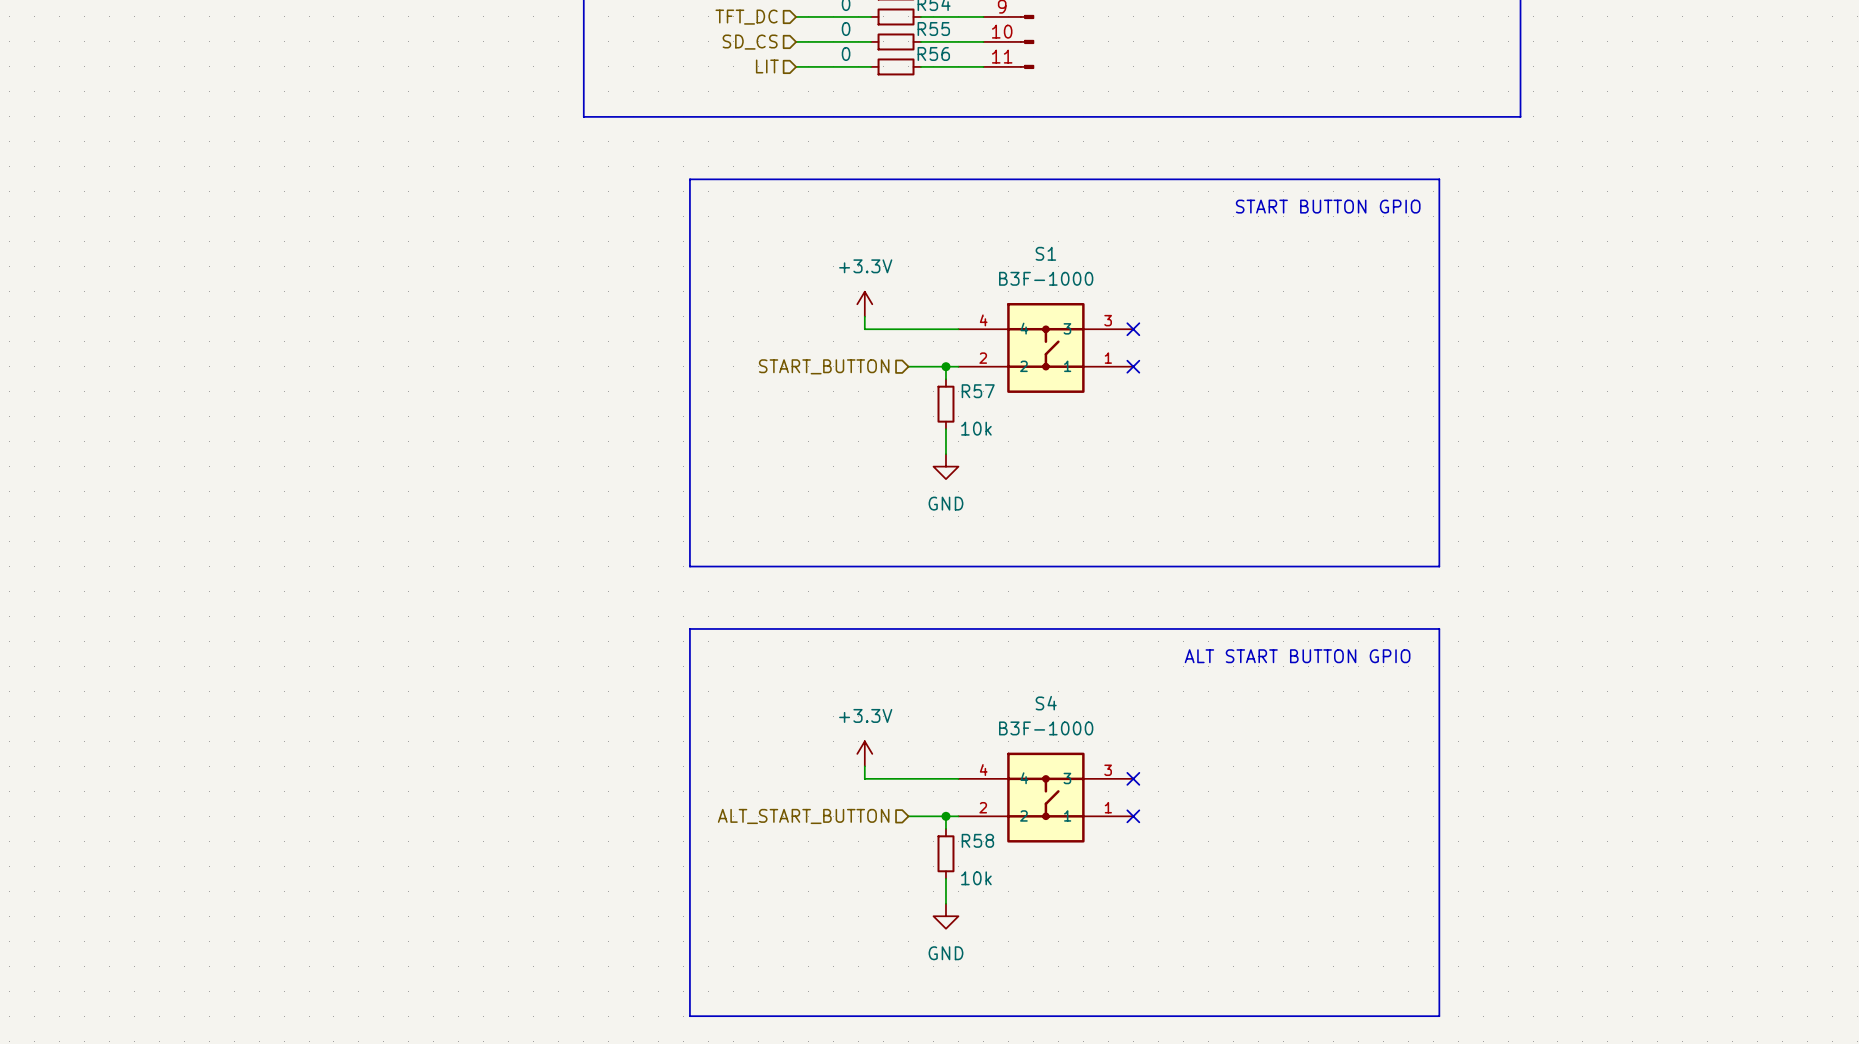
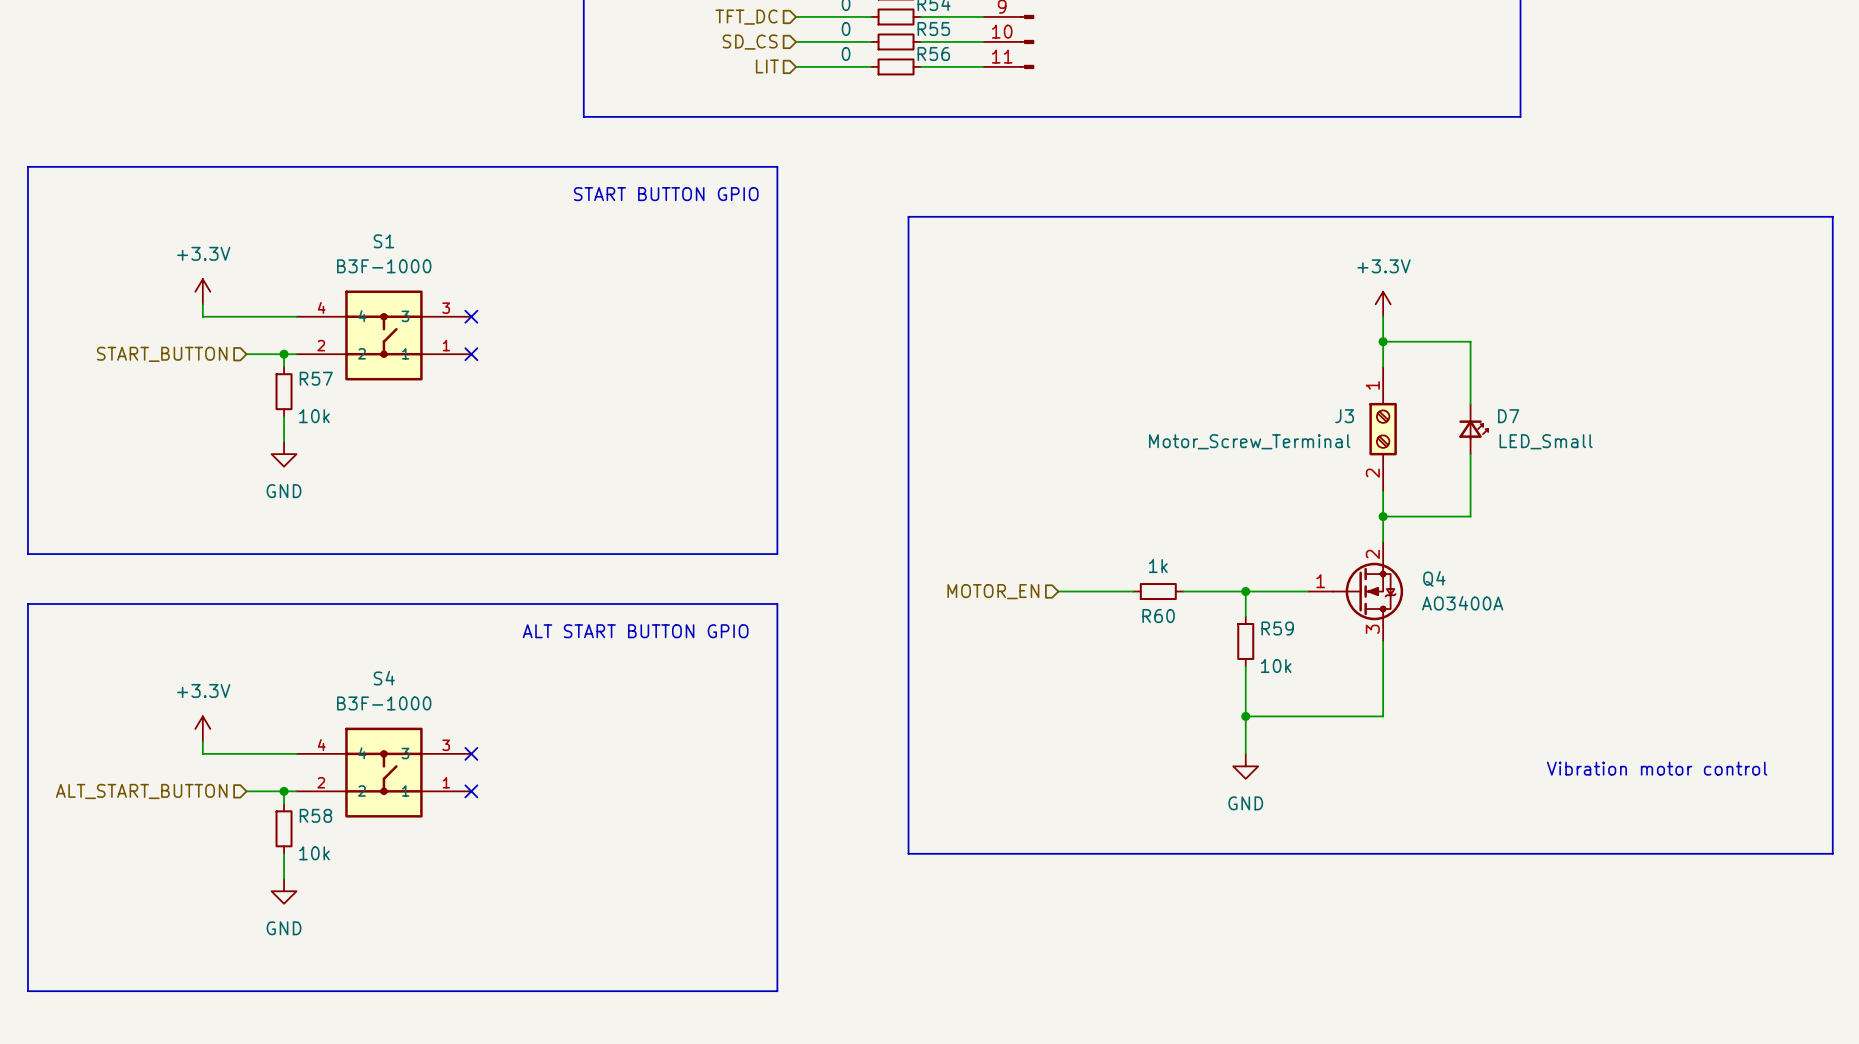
line: none -> (27, 166) (777, 166) (777, 554) (27, 554) (27, 166)
line: (689, 179) (689, 566) (1439, 566) (1439, 179) (689, 179) -> none
text: none -> START BUTTON GPIO (666, 194)
text: START BUTTON GPIO (1328, 206) -> none
line: none -> (908, 216) (1832, 216) (1832, 853) (908, 853) (908, 216)
power symbol: none -> +3.3V (202, 291)
wire: none -> (202, 304) (202, 316) (296, 316)
power symbol: +3.3V (864, 304) -> none
power symbol: none -> +3.3V (1383, 304)
no-connect mark: none -> (471, 316)
wire: (864, 316) (864, 329) (958, 329) -> none
wire: none -> (1383, 316) (1383, 366)
no-connect mark: (1133, 329) -> none
wire: none -> (1383, 341) (1470, 341) (1470, 404)
junction: none -> (1383, 341)
S1 position: (1045, 347) -> (383, 335)
hierarchical label: none -> START_BUTTON (162, 354)
wire: none -> (246, 354) (296, 354)
wire: none -> (284, 354) (284, 366)
junction: none -> (284, 354)
no-connect mark: none -> (471, 354)
hierarchical label: START_BUTTON (824, 366) -> none
wire: (908, 366) (958, 366) -> none
wire: (945, 366) (945, 379) -> none
junction: (945, 366) -> none
no-connect mark: (1133, 366) -> none
R57 position: (945, 404) -> (284, 391)
wire: none -> (284, 416) (284, 441)
wire: (945, 429) (945, 454) -> none
J3: none -> Motor_Screw_Terminal (1383, 429)
D7: none -> LED_Small (1473, 429)
power symbol: none -> GND (284, 454)
wire: none -> (1470, 454) (1470, 516) (1383, 516)
power symbol: GND (945, 466) -> none
wire: none -> (1383, 491) (1383, 541)
junction: none -> (1383, 516)
hierarchical label: none -> MOTOR_EN (993, 591)
wire: none -> (1058, 591) (1133, 591)
R60: none -> 1k (1158, 591)
wire: none -> (1183, 591) (1308, 591)
wire: none -> (1245, 591) (1245, 616)
junction: none -> (1245, 591)
Q4: none -> AO3400A (1355, 591)
line: none -> (27, 604) (777, 604) (777, 991) (27, 991) (27, 604)
line: (689, 628) (1439, 628) (1439, 1016) (689, 1016) (689, 628) -> none
text: none -> ALT START BUTTON GPIO (635, 631)
R59: none -> 10k (1245, 641)
wire: none -> (1383, 641) (1383, 716) (1245, 716)
text: ALT START BUTTON GPIO (1297, 656) -> none
wire: none -> (1245, 666) (1245, 753)
junction: none -> (1245, 716)
power symbol: none -> +3.3V (202, 728)
wire: none -> (202, 741) (202, 753) (296, 753)
no-connect mark: none -> (471, 753)
power symbol: +3.3V (864, 753) -> none
wire: (864, 766) (864, 778) (958, 778) -> none
power symbol: none -> GND (1245, 766)
text: none -> Vibration motor control (1657, 768)
no-connect mark: (1133, 778) -> none
hierarchical label: none -> ALT_START_BUTTON (141, 791)
wire: none -> (246, 791) (296, 791)
wire: none -> (284, 791) (284, 803)
junction: none -> (284, 791)
no-connect mark: none -> (471, 791)
S4 position: (1045, 797) -> (383, 772)
hierarchical label: ALT_START_BUTTON (803, 816) -> none
wire: (908, 816) (958, 816) -> none
wire: (945, 816) (945, 828) -> none
junction: (945, 816) -> none
no-connect mark: (1133, 816) -> none
wire: none -> (284, 853) (284, 878)
R58 position: (945, 853) -> (284, 828)
wire: (945, 878) (945, 903) -> none
power symbol: none -> GND (284, 891)
power symbol: GND (945, 916) -> none

